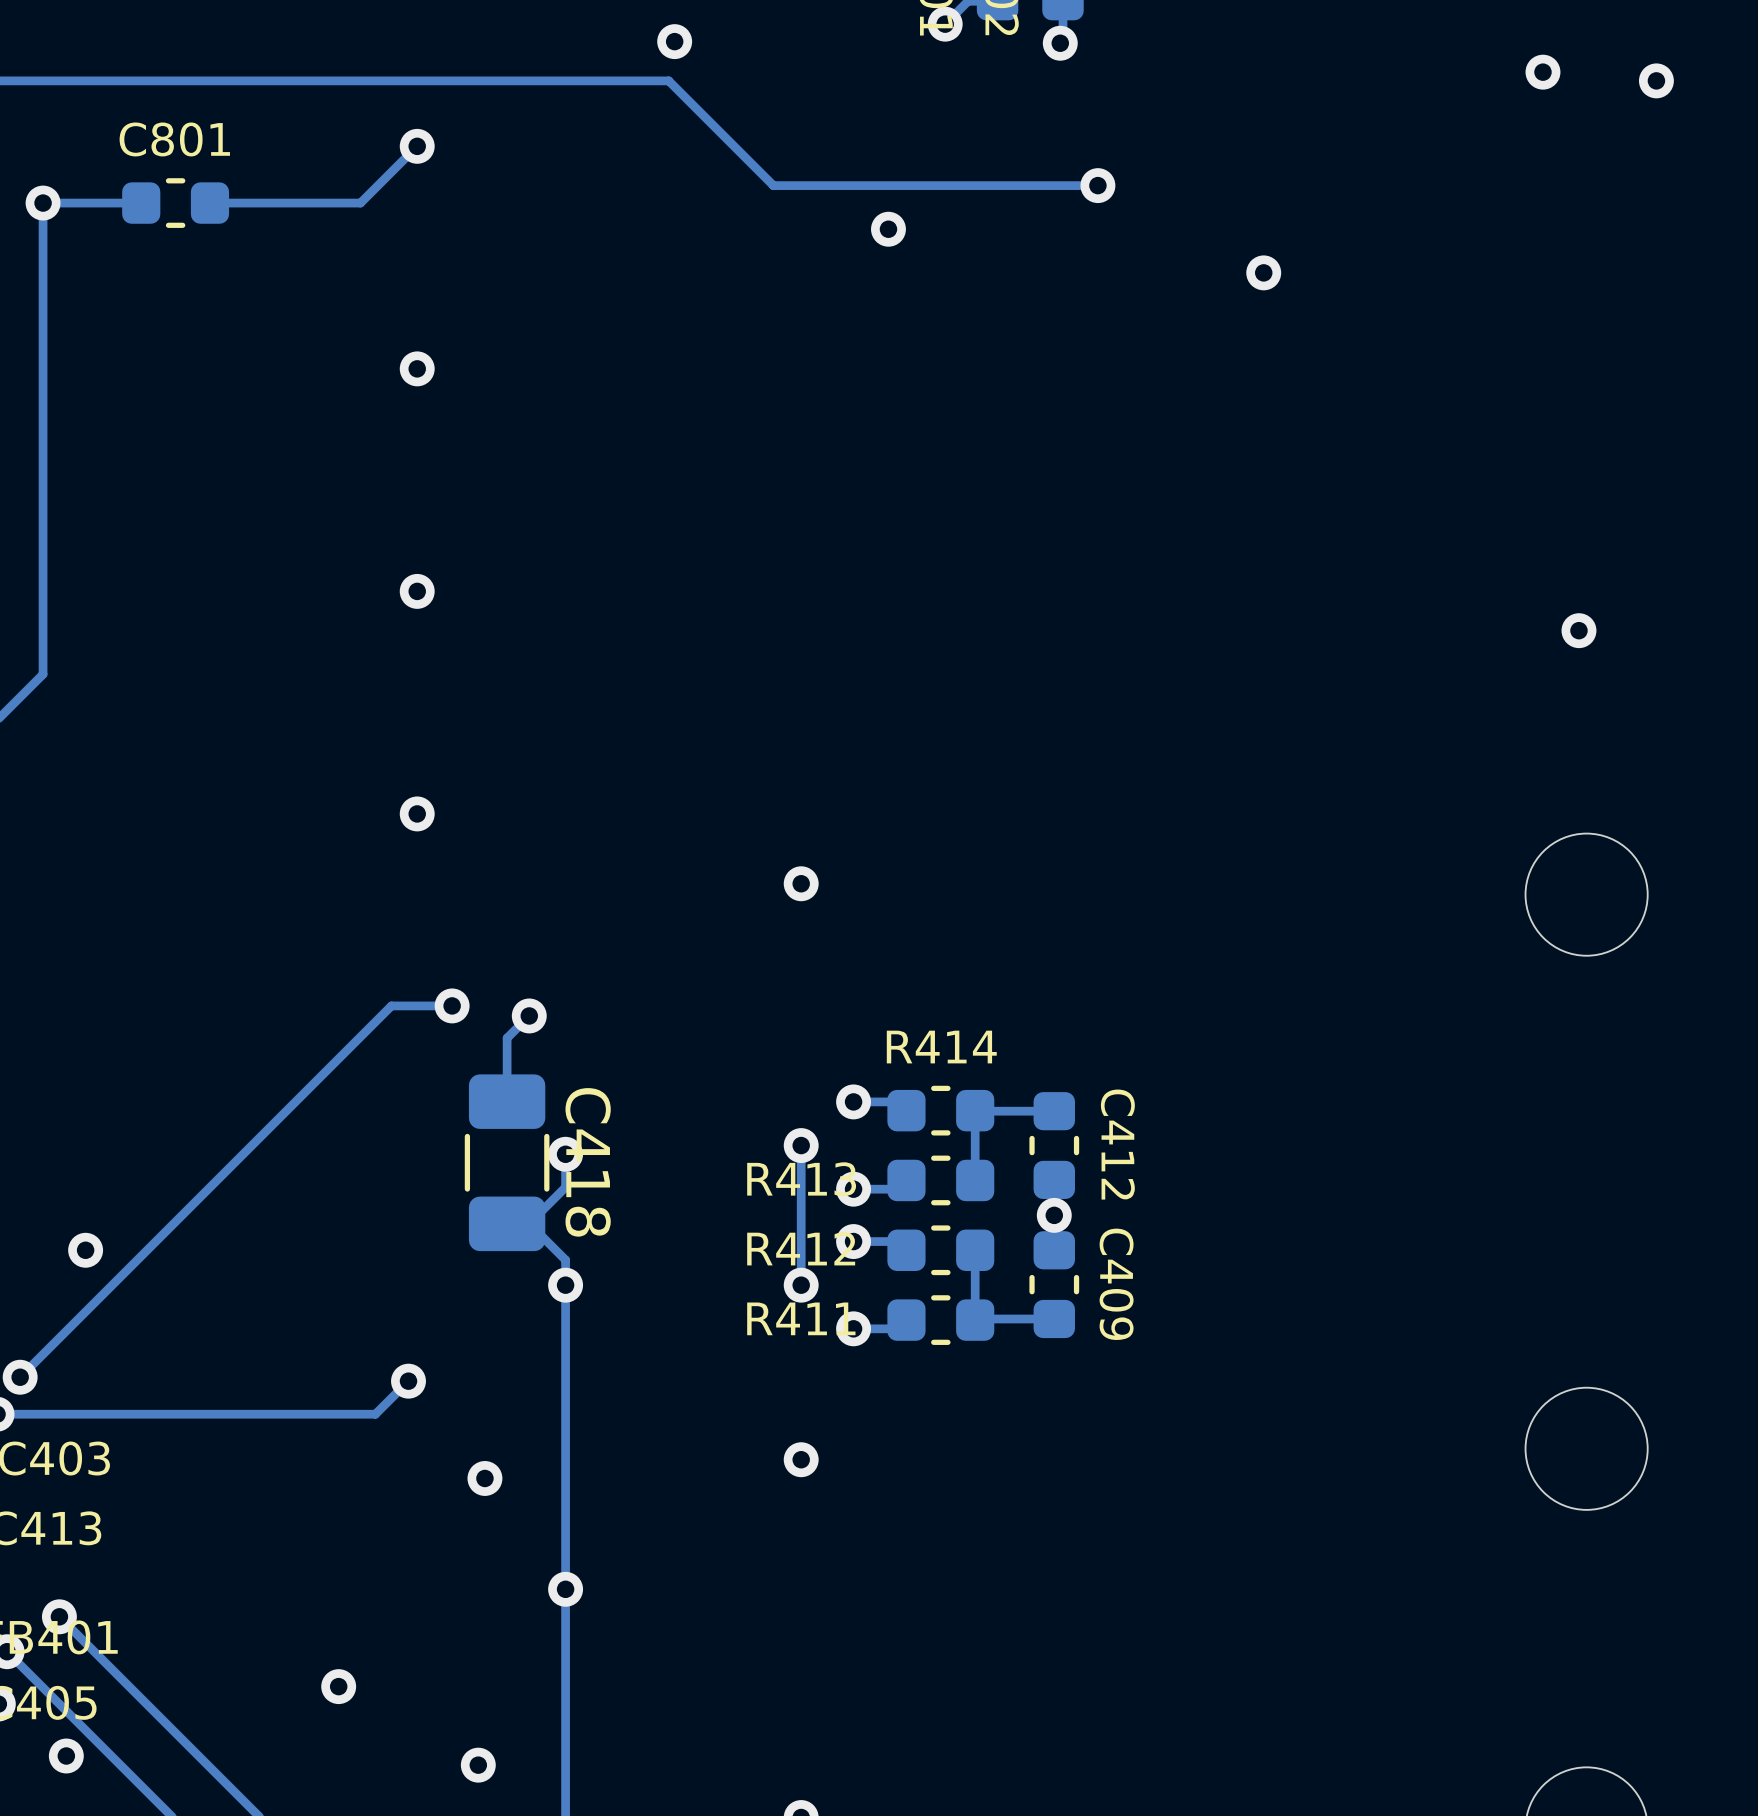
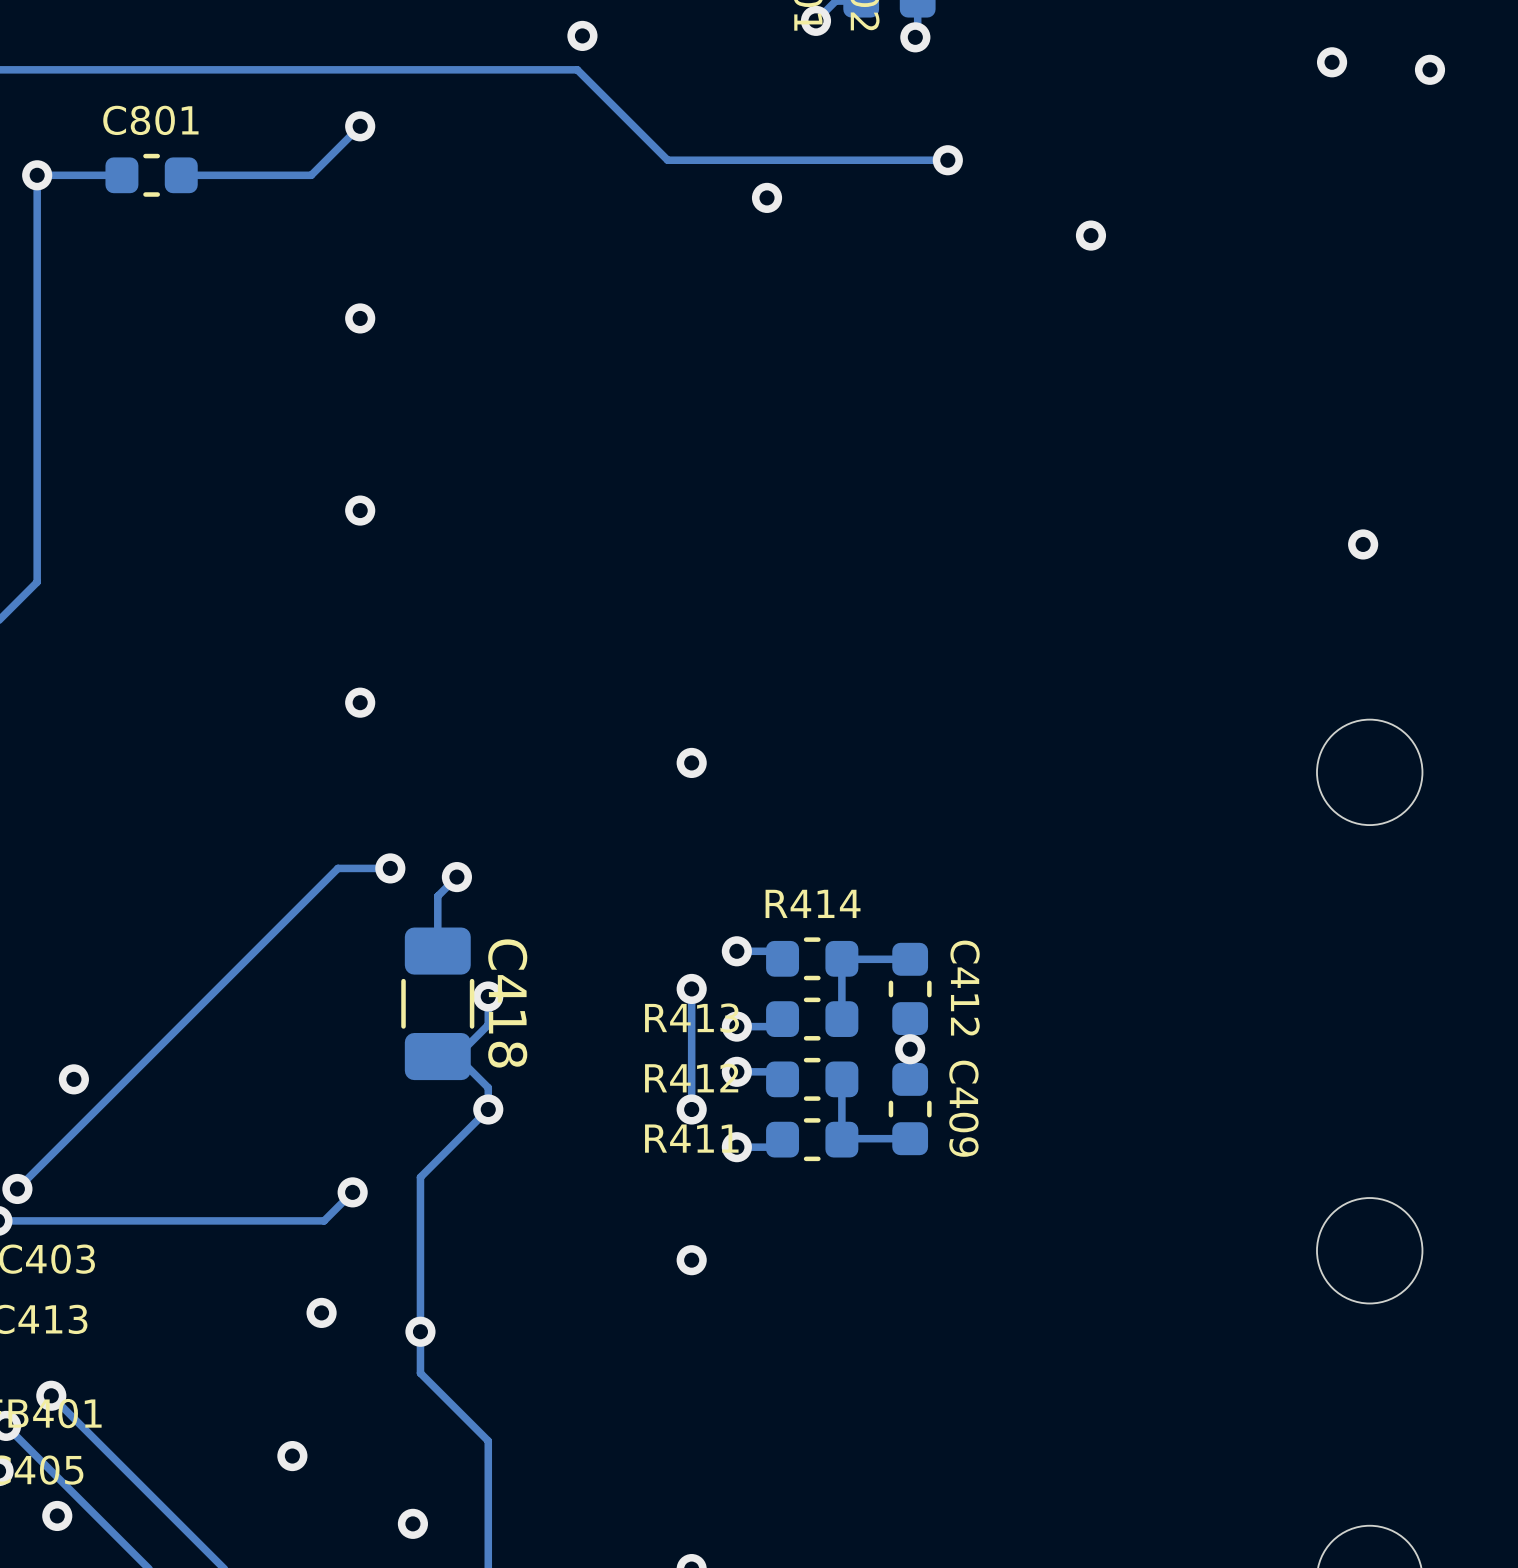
track: (565, 1285) (565, 1669) -> (488, 1109) (420, 1177) (420, 1373) (488, 1440)
via: (484, 1478) -> none
via: none -> (321, 1312)
via: none -> (420, 1331)
via: (565, 1589) -> none

